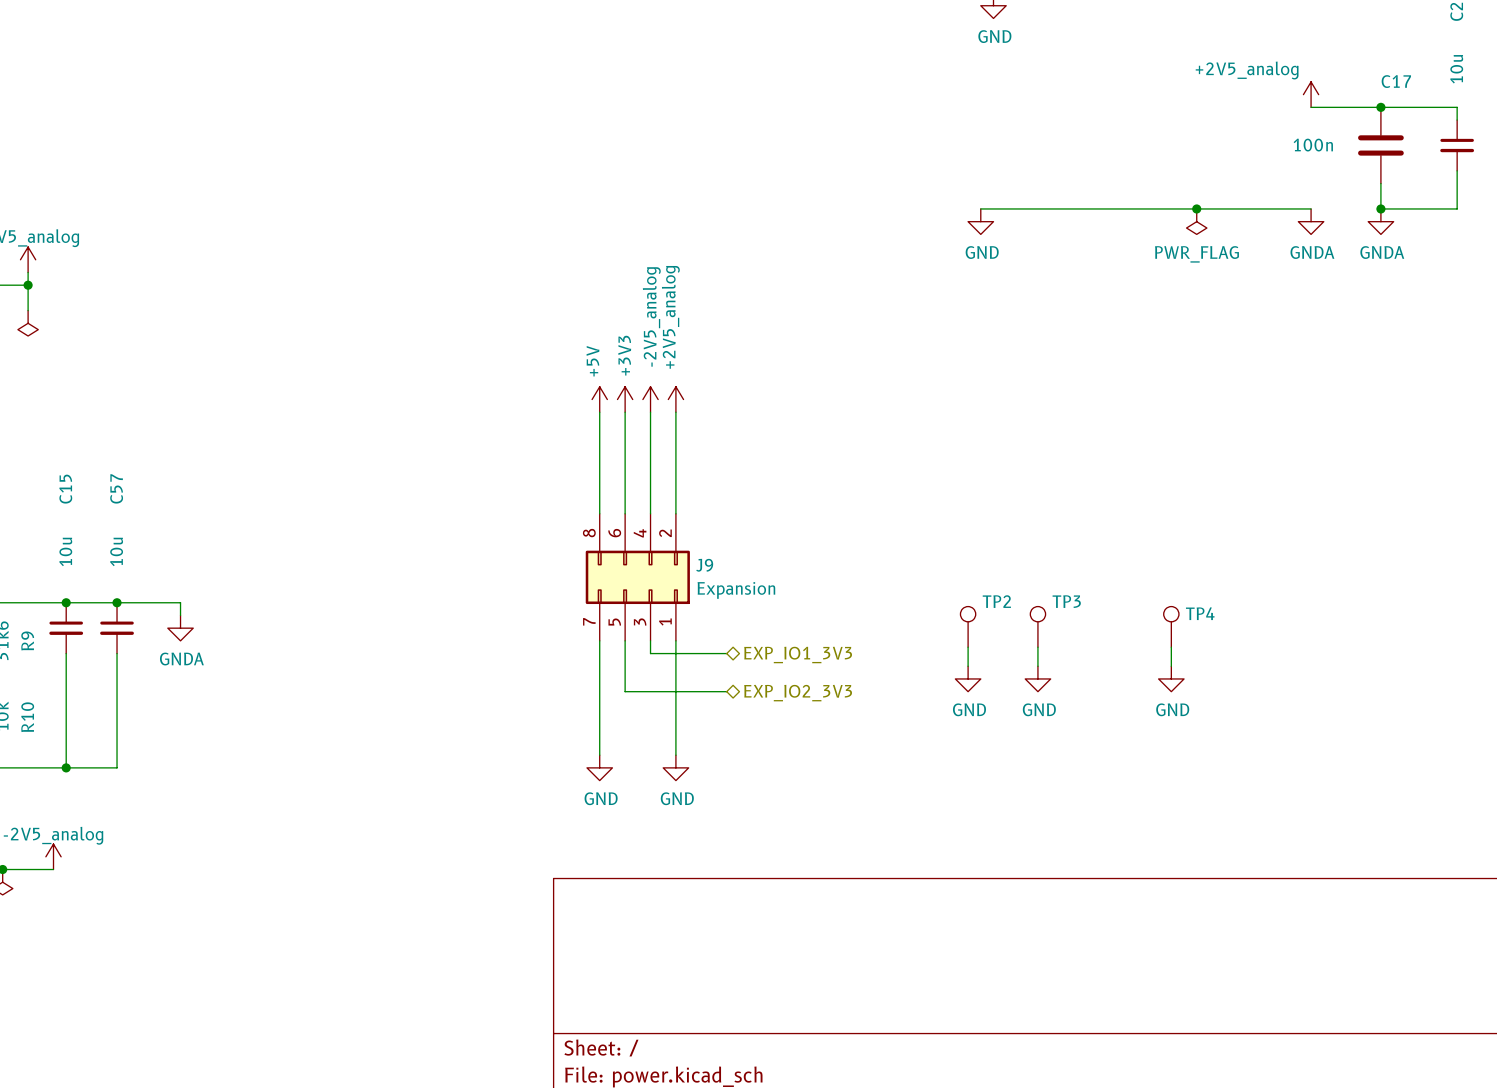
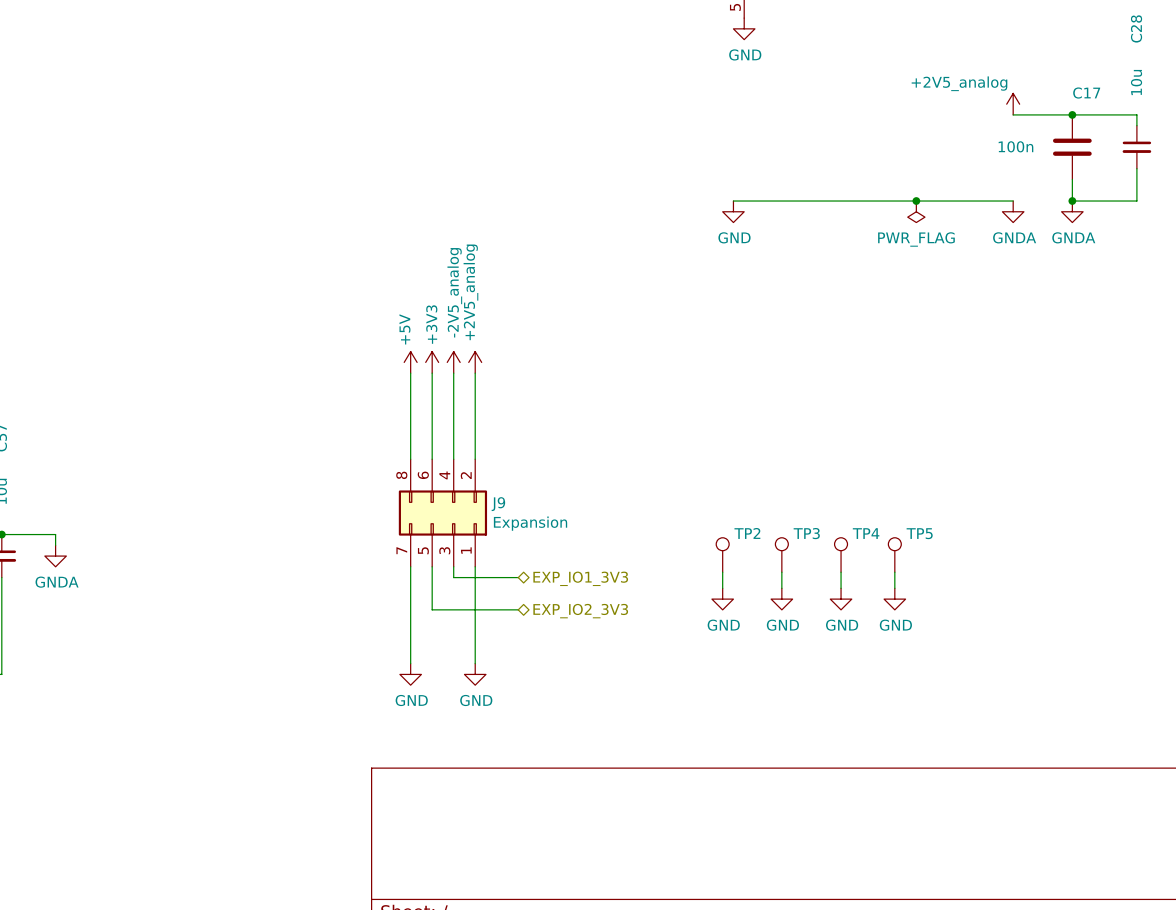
TP4 name: TP4 (1200, 613) -> TP5 (919, 533)
TP4: none -> (841, 554)
wire: none -> (841, 572) (841, 588)
power symbol: none -> GND (841, 599)

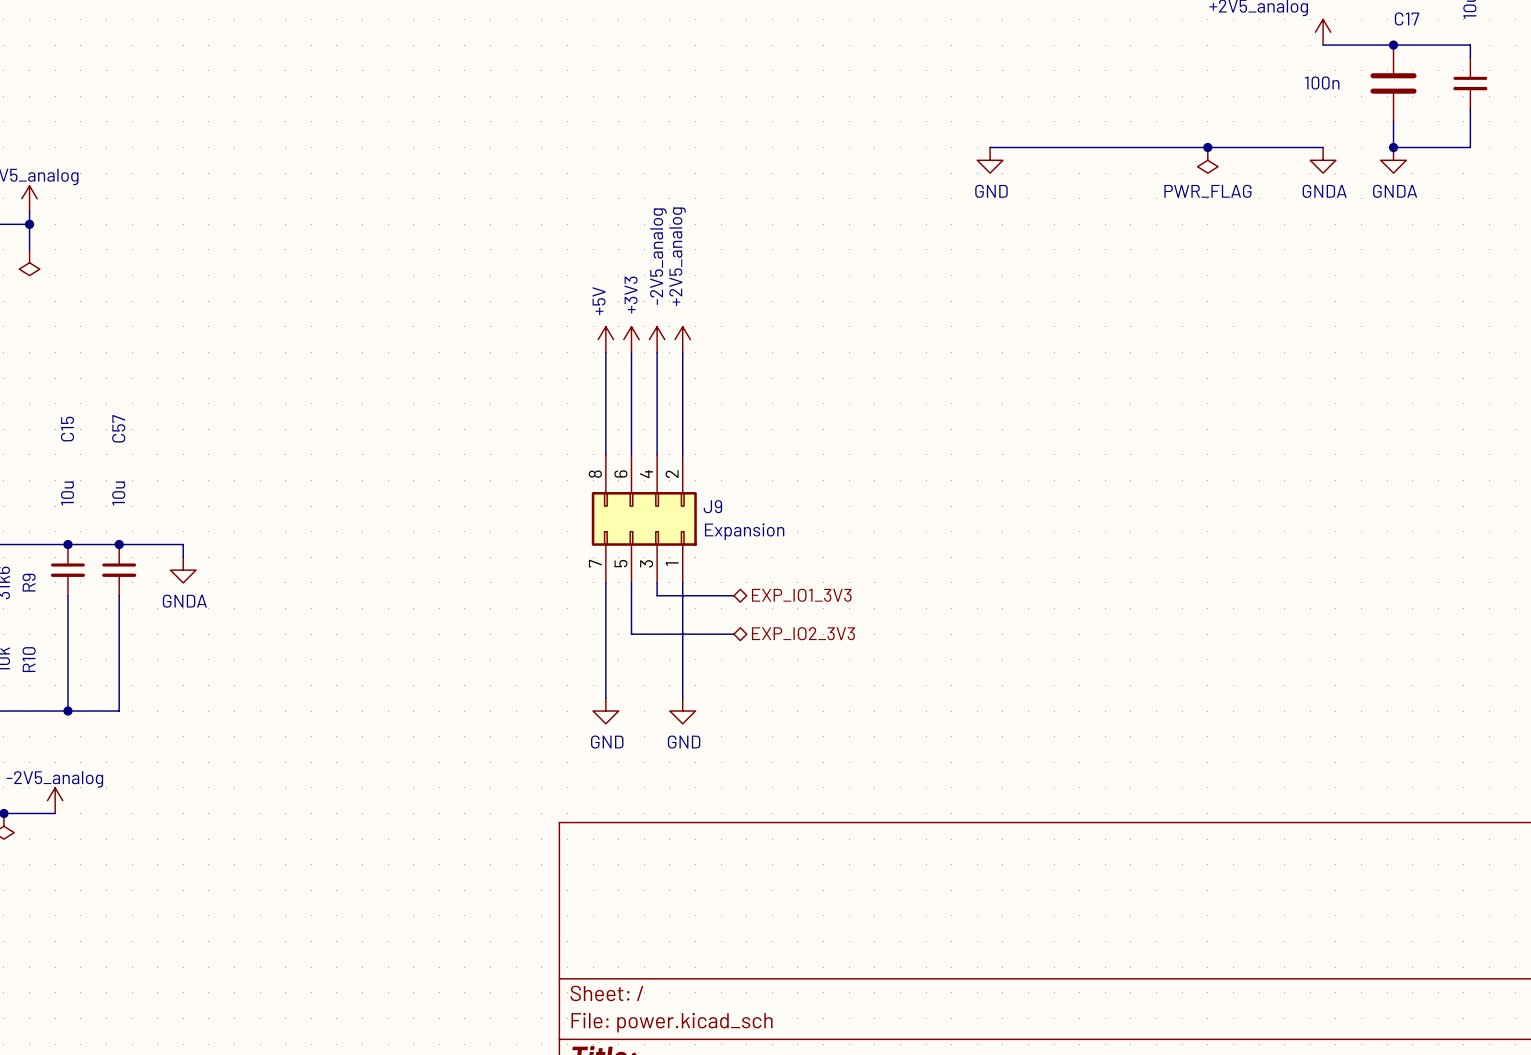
TP2: (722, 554) -> none
TP3: (781, 554) -> none
TP4: (841, 554) -> none
TP5: (894, 554) -> none
wire: (722, 572) (722, 588) -> none
wire: (781, 572) (781, 588) -> none
wire: (841, 572) (841, 588) -> none
wire: (894, 572) (894, 588) -> none
power symbol: GND (722, 599) -> none
power symbol: GND (781, 599) -> none
power symbol: GND (841, 599) -> none
power symbol: GND (894, 599) -> none

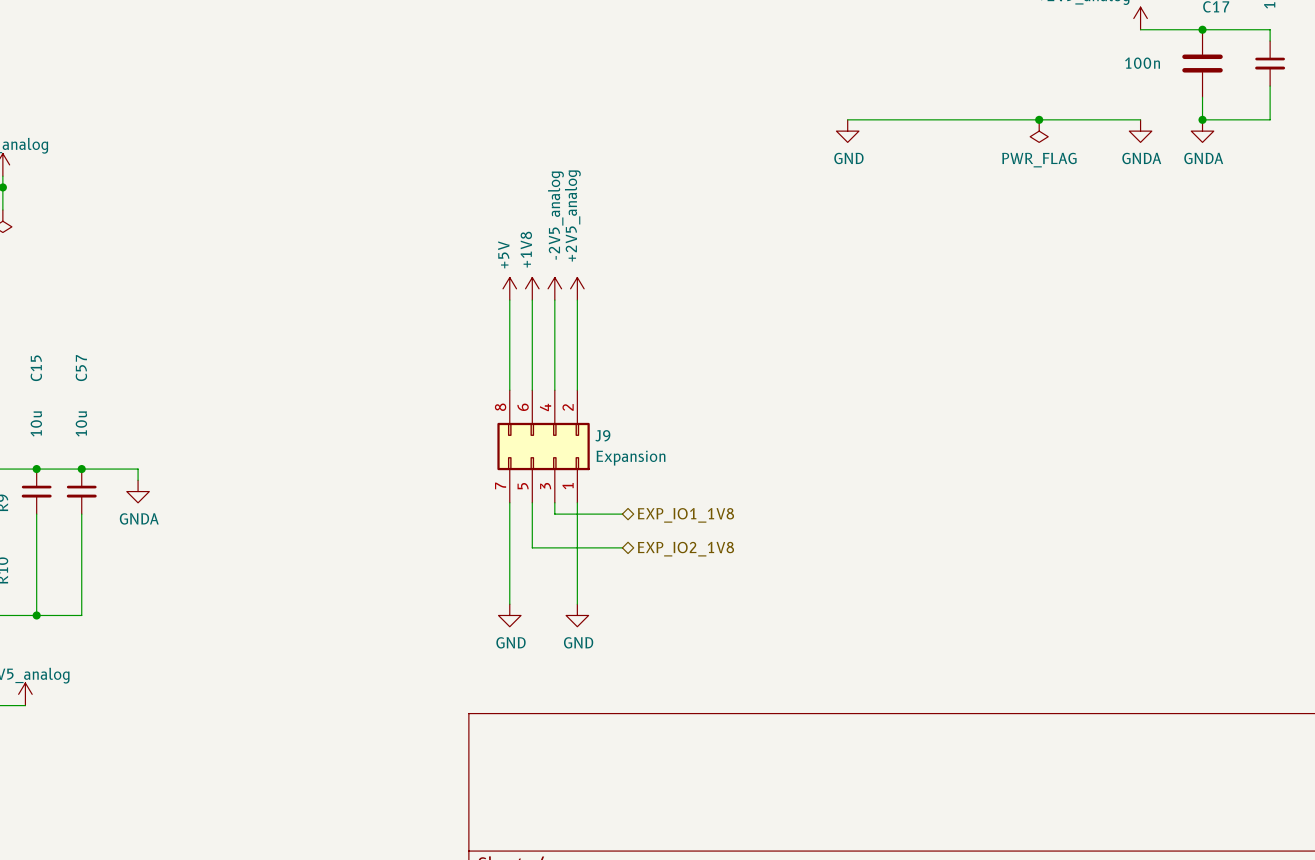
power symbol: +3V3 (631, 339) -> +1V8 (532, 288)
hierarchical label: EXP_IO1_3V3 (801, 595) -> EXP_IO1_1V8 (685, 515)
hierarchical label: EXP_IO2_3V3 (803, 633) -> EXP_IO2_1V8 (685, 549)

